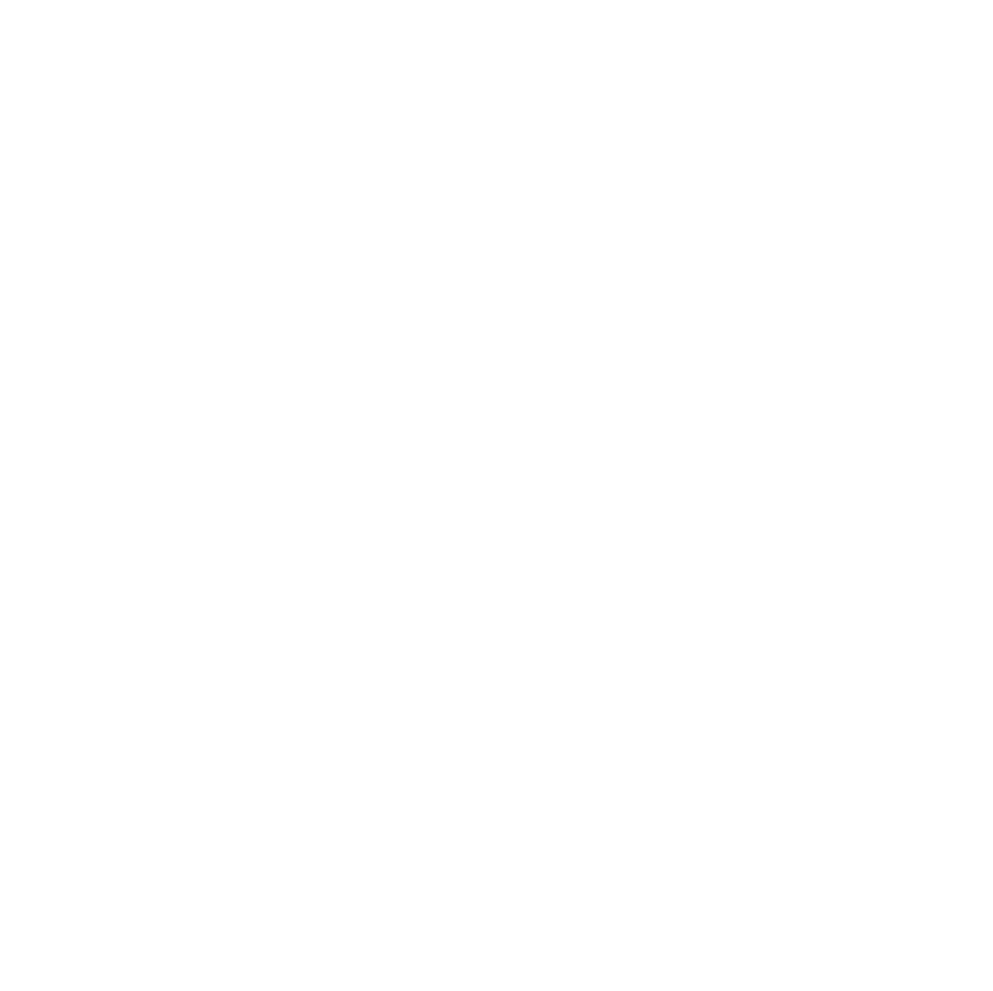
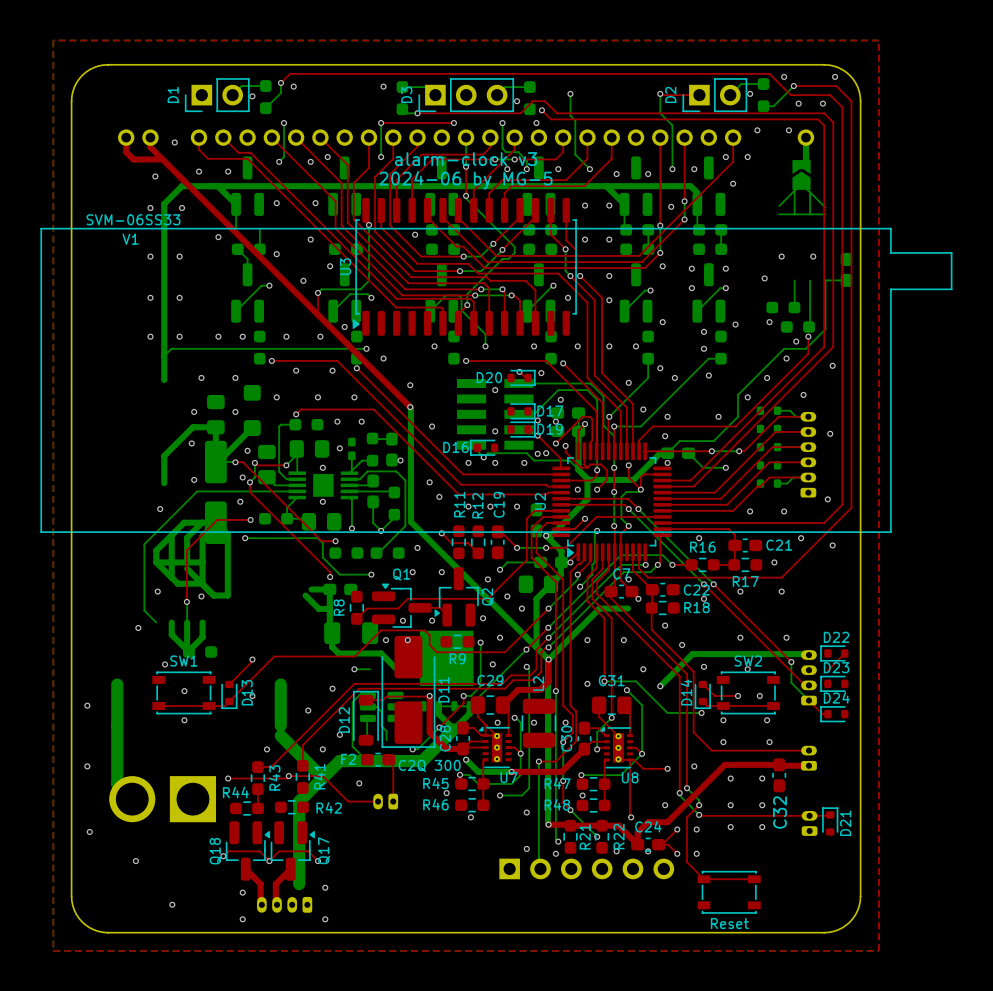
top zone outline: none -> (53, 40) (53, 950) (878, 950) (878, 40) (53, 40)
board edge: none -> (107, 64) (824, 64) (842, 69) (853, 79) (859, 91) (860, 101) (860, 896) (857, 910) (846, 925) (838, 929) (824, 932) (107, 932) (89, 927) (79, 918) (72, 905) (71, 896) (71, 101) (74, 87) (82, 75) (94, 67) (107, 64)
via: none -> (784, 76)
via: none -> (835, 76)
top track: none -> (280, 82) (290, 73) (769, 73) (790, 95) (830, 95) (842, 107) (842, 504) (824, 523) (662, 523)
bottom track: none -> (280, 82) (280, 93) (265, 108)
via: none -> (280, 82)
bottom track: none -> (763, 84) (741, 84) (730, 95)
bottom track: none -> (265, 86) (241, 86) (232, 95)
via: none -> (293, 86)
via: none -> (383, 86)
top track: none -> (793, 86) (836, 86) (851, 101) (851, 507) (781, 577) (648, 577) (639, 568) (639, 552)
bottom track: none -> (793, 86) (773, 106) (763, 106)
via: none -> (793, 86)
bottom track: none -> (402, 87) (427, 87)
bottom track: none -> (529, 87) (505, 87) (497, 95)
bottom track: none -> (570, 93) (570, 115) (575, 120) (575, 154) (589, 169)
via: none -> (570, 93)
top track: none -> (660, 93) (699, 95)
bottom track: none -> (660, 93) (660, 113) (672, 125) (672, 169)
via: none -> (660, 93)
via: none -> (750, 93)
D1: none -> (217, 95)
D3: none -> (466, 95)
D2: none -> (714, 95)
part: none -> (763, 95)
via: none -> (252, 96)
part: none -> (265, 97)
part: none -> (402, 98)
part: none -> (529, 98)
via: none -> (517, 101)
via: none -> (798, 103)
via: none -> (822, 103)
top track: none -> (541, 110) (551, 119) (818, 119) (824, 125) (824, 347) (730, 441)
via: none -> (541, 110)
bottom track: none -> (406, 113) (417, 113)
top track: none -> (417, 113) (520, 113) (532, 101) (544, 101) (557, 113) (824, 113) (833, 122) (833, 347) (693, 486) (662, 486)
via: none -> (417, 113)
bottom track: none -> (284, 123) (284, 157) (279, 161)
via: none -> (284, 123)
top track: none -> (381, 123) (453, 123)
bottom track: none -> (381, 123) (381, 157)
via: none -> (381, 123)
via: none -> (453, 123)
bottom track: none -> (502, 123) (502, 148) (506, 152) (518, 152) (526, 160) (526, 169)
via: none -> (502, 123)
via: none -> (536, 123)
via: none -> (757, 130)
via: none -> (788, 130)
top track: none -> (126, 137) (126, 152) (133, 159) (162, 159)
top track: none -> (150, 137) (150, 147) (410, 407)
top track: none -> (199, 137) (199, 149) (208, 158) (247, 158) (396, 307) (441, 307) (442, 323)
top track: none -> (223, 137) (238, 152) (250, 152) (396, 298) (470, 298) (473, 302) (473, 323)
top track: none -> (271, 137) (335, 201) (335, 228) (402, 295) (475, 295)
top track: none -> (296, 137) (341, 183) (341, 225) (405, 289) (481, 289)
top track: none -> (320, 137) (347, 164) (347, 222) (408, 283) (484, 283) (489, 288) (489, 323)
top track: none -> (368, 137) (368, 167) (353, 183) (353, 219) (411, 277) (486, 277) (490, 280) (525, 280) (535, 290) (535, 323)
top track: none -> (393, 137) (393, 158) (375, 177) (375, 231) (414, 271) (460, 271)
top track: none -> (417, 137) (417, 146) (390, 174) (390, 225) (421, 256) (463, 256)
bottom track: none -> (466, 137) (466, 166)
top track: none -> (490, 137) (490, 147) (483, 154) (421, 154) (396, 179) (396, 210)
top track: none -> (514, 137) (514, 149) (473, 190) (473, 210)
top track: none -> (563, 137) (563, 152) (555, 159) (514, 159)
top track: none -> (587, 137) (587, 158) (566, 180) (502, 180) (489, 193) (489, 210)
top track: none -> (611, 137) (611, 158) (584, 186) (511, 186) (504, 193) (504, 210)
top track: none -> (660, 137) (660, 225)
top track: none -> (684, 137) (684, 201)
top track: none -> (733, 137) (733, 161) (639, 255) (496, 255) (458, 217)
bottom track: none -> (805, 137) (805, 161) (801, 166)
via: none -> (174, 142)
via: none -> (327, 157)
via: none -> (381, 157)
via: none -> (725, 157)
via: none -> (747, 157)
text: none -> alarm-clock v3 (466, 159)
top track: none -> (495, 159) (432, 159) (412, 179) (412, 210)
bottom track: none -> (495, 159) (514, 159)
via: none -> (495, 159)
via: none -> (514, 159)
via: none -> (279, 161)
via: none -> (310, 161)
top track: none -> (466, 166) (466, 195)
via: none -> (466, 166)
via: none -> (507, 169)
via: none -> (526, 169)
via: none -> (558, 169)
via: none -> (589, 169)
via: none -> (672, 169)
via: none -> (694, 169)
via: none -> (199, 171)
via: none -> (228, 171)
via: none -> (616, 174)
via: none -> (648, 174)
part: none -> (801, 174)
via: none -> (155, 176)
text: none -> 2024-06 by MG-5 (465, 180)
via: none -> (733, 183)
bottom track: none -> (217, 186) (236, 204) (236, 228)
part: none -> (247, 186)
part: none -> (344, 186)
part: none -> (441, 186)
part: none -> (538, 186)
bottom track: none -> (606, 186) (624, 204) (624, 228)
part: none -> (636, 186)
part: none -> (708, 186)
bottom track: none -> (794, 190) (794, 214)
bottom track: none -> (810, 192) (810, 214)
bottom track: none -> (466, 195) (466, 198) (514, 246) (514, 252) (508, 258) (502, 258) (467, 294) (467, 305)
via: none -> (466, 195)
bottom track: none -> (684, 201) (684, 219)
via: none -> (684, 201)
via: none -> (276, 203)
via: none -> (315, 203)
via: none -> (585, 205)
via: none -> (609, 205)
via: none -> (671, 206)
bottom track: none -> (779, 206) (801, 183) (825, 207)
via: none -> (150, 208)
via: none -> (182, 208)
top track: none -> (381, 210) (381, 227) (417, 263) (468, 263) (478, 273) (558, 273) (587, 302) (587, 377) (620, 411) (620, 451)
top track: none -> (550, 210) (550, 234) (565, 249)
top track: none -> (566, 210) (566, 240) (575, 249)
bottom track: none -> (779, 214) (825, 214)
top track: none -> (535, 216) (502, 249)
top track: none -> (427, 217) (456, 246) (463, 246) (484, 268) (645, 268) (660, 252)
top track: none -> (442, 217) (487, 262) (642, 262) (684, 219)
top track: none -> (520, 217) (493, 243)
via: none -> (684, 219)
bottom track: none -> (368, 225) (368, 280) (360, 289) (321, 289) (317, 292)
via: none -> (368, 225)
bottom track: none -> (660, 225) (660, 252)
via: none -> (660, 225)
bottom track: none -> (697, 228) (697, 192) (690, 186) (182, 186) (164, 203) (164, 380)
bottom track: none -> (259, 229) (259, 249)
part: none -> (443, 229)
part: none -> (540, 229)
part: none -> (637, 229)
bottom track: none -> (648, 229) (648, 249)
part: none -> (710, 229)
bottom track: none -> (721, 229) (721, 249)
via: none -> (415, 234)
via: none -> (218, 237)
via: none -> (310, 239)
via: none -> (585, 239)
via: none -> (609, 239)
bottom track: none -> (493, 243) (480, 256) (463, 256)
via: none -> (493, 243)
bottom track: none -> (237, 249) (247, 259) (247, 274)
part: none -> (248, 249)
part: none -> (345, 249)
part: none -> (443, 249)
bottom track: none -> (502, 249) (481, 271) (460, 271)
via: none -> (502, 249)
part: none -> (540, 249)
bottom track: none -> (565, 249) (565, 271) (570, 275)
via: none -> (565, 249)
part: none -> (637, 249)
part: none -> (710, 249)
via: none -> (660, 252)
via: none -> (276, 254)
via: none -> (150, 256)
via: none -> (179, 256)
via: none -> (463, 256)
via: none -> (781, 256)
via: none -> (813, 256)
via: none -> (330, 266)
U3: none -> (464, 266)
via: none -> (662, 266)
via: none -> (691, 268)
via: none -> (725, 268)
part: none -> (846, 269)
via: none -> (460, 271)
top track: none -> (570, 275) (594, 300) (594, 375) (626, 407) (626, 451)
via: none -> (570, 275)
top track: none -> (580, 275) (602, 297) (602, 373) (632, 404) (632, 451)
via: none -> (580, 275)
via: none -> (609, 275)
via: none -> (764, 278)
via: none -> (303, 280)
bottom track: none -> (794, 280) (794, 307)
bottom track: none -> (810, 280) (810, 325)
bottom track: none -> (825, 280) (846, 280)
bottom track: none -> (825, 280) (825, 329) (805, 348) (784, 348) (737, 394) (737, 416) (713, 441) (679, 441) (667, 453) (660, 453) (633, 479) (587, 479)
bottom track: none -> (269, 285) (261, 285) (236, 311)
via: none -> (269, 285)
bottom track: none -> (553, 285) (527, 311)
via: none -> (553, 285)
via: none -> (691, 288)
bottom track: none -> (725, 288) (720, 288) (697, 311)
via: none -> (725, 288)
bottom track: none -> (481, 289) (502, 289)
via: none -> (481, 289)
top track: none -> (502, 289) (504, 291) (504, 323)
via: none -> (502, 289)
bottom track: none -> (650, 290) (645, 290) (624, 311)
via: none -> (650, 290)
part: none -> (247, 292)
top track: none -> (317, 292) (319, 316)
via: none -> (317, 292)
part: none -> (344, 292)
part: none -> (441, 292)
part: none -> (538, 292)
part: none -> (636, 292)
part: none -> (708, 292)
bottom track: none -> (475, 295) (511, 295)
via: none -> (475, 295)
top track: none -> (511, 295) (514, 295) (520, 300) (520, 323)
via: none -> (511, 295)
via: none -> (150, 297)
via: none -> (179, 297)
bottom track: none -> (371, 297) (367, 294) (350, 294) (333, 311)
via: none -> (371, 297)
via: none -> (568, 297)
via: none -> (609, 300)
top track: none -> (467, 305) (458, 314)
via: none -> (467, 305)
part: none -> (783, 307)
bottom track: none -> (430, 311) (446, 295) (458, 295) (461, 298) (461, 310) (485, 334) (485, 346)
via: none -> (662, 322)
via: none -> (769, 322)
via: none -> (735, 324)
via: none -> (344, 326)
part: none -> (797, 326)
V1: none -> SVM-06SS33 (496, 331)
via: none -> (703, 331)
via: none -> (150, 336)
via: none -> (179, 336)
via: none -> (218, 336)
via: none -> (242, 336)
via: none -> (286, 336)
via: none -> (320, 336)
top track: none -> (808, 336) (808, 353) (735, 426) (653, 426) (639, 440) (639, 451)
via: none -> (808, 336)
via: none -> (796, 341)
via: none -> (434, 346)
via: none -> (485, 346)
via: none -> (534, 346)
via: none -> (577, 346)
via: none -> (609, 346)
via: none -> (636, 346)
part: none -> (259, 347)
part: none -> (356, 347)
part: none -> (453, 347)
part: none -> (551, 347)
part: none -> (648, 347)
part: none -> (720, 347)
bottom track: none -> (366, 348) (171, 348) (164, 356)
via: none -> (366, 348)
via: none -> (703, 348)
via: none -> (383, 358)
bottom track: none -> (648, 358) (648, 377) (609, 416)
bottom track: none -> (720, 358) (708, 358) (640, 426) (614, 426)
via: none -> (786, 358)
top track: none -> (271, 360) (337, 360) (461, 484) (546, 484) (548, 486) (561, 486)
via: none -> (271, 360)
top track: none -> (466, 360) (546, 360) (596, 411) (596, 451)
via: none -> (466, 360)
top track: none -> (563, 363) (602, 402) (602, 451)
via: none -> (563, 363)
via: none -> (832, 365)
top track: none -> (356, 368) (463, 474) (561, 474)
via: none -> (356, 368)
via: none -> (660, 368)
via: none -> (296, 370)
via: none -> (332, 370)
top track: none -> (519, 371) (525, 377)
via: none -> (519, 371)
via: none -> (541, 373)
via: none -> (708, 375)
via: none -> (201, 377)
via: none -> (235, 377)
D20: none -> (521, 377)
via: none -> (674, 377)
via: none -> (767, 377)
via: none -> (628, 382)
bottom track: none -> (518, 383) (590, 383) (603, 396) (603, 425) (614, 436) (614, 467)
via: none -> (410, 385)
via: none -> (495, 390)
via: none -> (803, 394)
via: none -> (276, 397)
via: none -> (317, 397)
via: none -> (354, 397)
via: none -> (747, 397)
via: none -> (560, 399)
bottom track: none -> (410, 407) (410, 521) (548, 659)
via: none -> (410, 407)
via: none -> (643, 409)
part: none -> (252, 410)
part: none -> (768, 410)
bottom track: none -> (777, 410) (790, 410) (796, 416) (808, 416)
via: none -> (194, 411)
via: none -> (235, 411)
D17: none -> (521, 411)
part: none -> (568, 413)
bottom track: none -> (578, 413) (578, 469) (587, 478) (587, 499) (551, 535) (546, 535) (561, 551) (561, 562) (570, 562)
part: none -> (215, 414)
top track: none -> (296, 414) (300, 409) (373, 409) (458, 494) (546, 494) (548, 492) (561, 492)
via: none -> (296, 414)
part: none -> (495, 414)
bottom track: none -> (518, 414) (534, 414) (558, 390) (587, 390) (597, 399) (597, 470)
top track: none -> (609, 416) (608, 450)
via: none -> (609, 416)
via: none -> (667, 416)
via: none -> (718, 416)
top track: none -> (808, 416) (778, 416) (744, 451) (739, 451)
via: none -> (537, 420)
via: none -> (337, 421)
via: none -> (361, 421)
via: none -> (555, 421)
bottom track: none -> (295, 424) (280, 424) (279, 426) (279, 471) (286, 479) (297, 479)
part: none -> (306, 424)
top track: none -> (585, 424) (578, 430) (578, 451)
via: none -> (585, 424)
via: none -> (432, 426)
top track: none -> (614, 426) (614, 450)
via: none -> (614, 426)
bottom track: none -> (252, 428) (220, 460)
part: none -> (768, 428)
D19: none -> (521, 429)
top track: none -> (527, 429) (531, 429) (560, 458) (560, 467)
via: none -> (495, 431)
part: none -> (568, 431)
top track: none -> (808, 431) (775, 431) (714, 492) (662, 492)
via: none -> (830, 433)
via: none -> (537, 435)
via: none -> (665, 436)
bottom track: none -> (373, 439) (391, 439)
top track: none -> (730, 441) (690, 480) (662, 480)
via: none -> (191, 443)
top track: none -> (555, 443) (582, 416) (589, 416) (592, 419) (590, 451)
via: none -> (555, 443)
bottom track: none -> (471, 445) (483, 457) (487, 453) (526, 453) (534, 460) (569, 460) (578, 469)
top track: none -> (565, 445) (565, 452) (581, 467) (587, 467)
via: none -> (565, 445)
D16: none -> (484, 447)
part: none -> (768, 447)
top track: none -> (808, 447) (772, 447) (720, 498) (662, 498)
part: none -> (309, 448)
via: none -> (339, 448)
part: none -> (351, 448)
bottom track: none -> (297, 449) (297, 473)
part: none -> (372, 449)
part: none -> (391, 449)
via: none -> (247, 450)
top track: none -> (584, 451) (584, 464) (587, 467)
top track: none -> (645, 451) (711, 451)
bottom track: none -> (711, 451) (739, 451)
via: none -> (711, 451)
via: none -> (739, 451)
via: none -> (537, 453)
via: none -> (546, 453)
part: none -> (678, 453)
bottom track: none -> (688, 453) (703, 467) (725, 467)
bottom track: none -> (296, 454) (286, 465)
part: none -> (808, 454)
bottom track: none -> (351, 455) (351, 470)
via: none -> (483, 457)
bottom track: none -> (372, 460) (362, 460) (349, 473)
via: none -> (400, 460)
top track: none -> (235, 462) (242, 462) (321, 541) (335, 541)
bottom track: none -> (235, 462) (215, 462) (215, 427) (192, 427) (164, 455) (164, 483)
via: none -> (235, 462)
top track: none -> (254, 462) (257, 465) (286, 465)
bottom track: none -> (254, 462) (254, 477) (250, 482)
via: none -> (254, 462)
via: none -> (468, 462)
via: none -> (495, 462)
via: none -> (524, 462)
via: none -> (667, 462)
top track: none -> (808, 462) (769, 462) (727, 504) (662, 504)
part: none -> (266, 464)
via: none -> (286, 465)
top track: none -> (628, 465) (628, 477) (640, 489) (640, 477) (643, 474) (662, 474)
via: none -> (628, 465)
part: none -> (768, 465)
via: none -> (322, 467)
top track: none -> (587, 467) (590, 464) (601, 464) (606, 470) (606, 479) (597, 489)
top track: none -> (614, 467) (614, 492)
via: none -> (614, 467)
via: none -> (725, 467)
top track: none -> (597, 470) (597, 475) (591, 480) (561, 480)
via: none -> (597, 470)
via: none -> (242, 477)
bottom track: none -> (266, 477) (275, 485) (297, 485)
top track: none -> (808, 477) (769, 477) (733, 510) (662, 510)
bottom track: none -> (808, 477) (793, 477) (787, 483) (777, 483)
via: none -> (194, 479)
bottom track: none -> (349, 479) (359, 479) (367, 471) (396, 471) (405, 480) (405, 526) (378, 553)
top track: none -> (250, 482) (250, 492) (330, 572) (330, 577)
via: none -> (250, 482)
via: none -> (429, 482)
part: none -> (768, 483)
part: none -> (323, 485)
bottom track: none -> (349, 485) (368, 485)
via: none -> (577, 489)
via: none -> (597, 489)
bottom track: none -> (640, 489) (638, 492) (626, 492) (621, 496) (621, 518) (628, 526)
via: none -> (640, 489)
bottom track: none -> (297, 491) (197, 491) (144, 544) (144, 610) (156, 622)
bottom track: none -> (349, 491) (393, 491)
part: none -> (373, 491)
part: none -> (215, 492)
bottom track: none -> (614, 492) (614, 526)
via: none -> (614, 492)
via: none -> (439, 496)
bottom track: none -> (297, 497) (287, 507) (287, 518) (305, 518)
bottom track: none -> (349, 497) (351, 500) (351, 528)
top track: none -> (561, 498) (628, 498) (638, 509)
via: none -> (827, 499)
via: none -> (240, 501)
via: none -> (322, 501)
bottom track: none -> (373, 501) (373, 522) (381, 530) (394, 517)
U2: none -> (611, 501)
part: none -> (394, 503)
top track: none -> (561, 504) (624, 504) (628, 509)
via: none -> (468, 506)
via: none -> (490, 506)
via: none -> (517, 506)
via: none -> (160, 509)
bottom track: none -> (628, 509) (703, 584)
via: none -> (628, 509)
bottom track: none -> (638, 509) (713, 584)
via: none -> (638, 509)
top track: none -> (561, 510) (534, 510) (526, 518) (526, 560) (487, 598) (407, 598) (398, 608) (367, 608) (356, 618)
via: none -> (750, 511)
via: none -> (784, 511)
top track: none -> (561, 516) (543, 516) (531, 528) (531, 557) (555, 581) (555, 691)
top track: none -> (662, 516) (596, 516) (565, 547) (546, 547)
part: none -> (276, 518)
top track: none -> (585, 518) (574, 529) (561, 529)
via: none -> (585, 518)
top track: none -> (250, 519) (217, 519) (186, 550) (186, 601)
via: none -> (250, 519)
part: none -> (536, 520)
part: none -> (321, 521)
bottom track: none -> (202, 522) (187, 537) (187, 562)
bottom track: none -> (215, 522) (202, 535) (202, 584)
bottom track: none -> (215, 522) (227, 534) (227, 595) (213, 595) (187, 568)
bottom track: none -> (215, 522) (184, 522) (156, 550) (156, 562)
top track: none -> (561, 523) (546, 523) (536, 533) (536, 552) (563, 579) (563, 705) (572, 715) (572, 732) (563, 742)
top track: none -> (614, 526) (614, 587)
via: none -> (614, 526)
top track: none -> (628, 526) (620, 533) (620, 580) (638, 598)
via: none -> (628, 526)
via: none -> (351, 528)
top track: none -> (662, 529) (728, 529) (734, 534) (734, 564)
via: none -> (381, 530)
bottom track: none -> (597, 530) (594, 533) (594, 562) (592, 564) (592, 574) (580, 586)
via: none -> (597, 530)
top track: none -> (500, 531) (517, 547)
top track: none -> (441, 533) (451, 543) (467, 543) (478, 553)
via: none -> (441, 533)
bottom track: none -> (171, 535) (171, 577) (177, 583) (202, 583)
via: none -> (546, 535)
top track: none -> (662, 535) (660, 537) (660, 562) (657, 564)
bottom track: none -> (245, 538) (317, 538) (322, 543) (322, 557) (339, 574) (371, 574)
via: none -> (245, 538)
via: none -> (699, 538)
via: none -> (801, 538)
via: none -> (335, 541)
R11: none -> (458, 542)
R12: none -> (478, 542)
C19: none -> (497, 542)
C21: none -> (745, 545)
via: none -> (832, 545)
via: none -> (417, 547)
bottom track: none -> (517, 547) (546, 547)
via: none -> (517, 547)
via: none -> (546, 547)
top track: none -> (578, 552) (570, 562)
top track: none -> (590, 552) (590, 561) (577, 574)
top track: none -> (596, 552) (596, 567) (587, 577) (587, 601) (604, 618) (604, 681)
top track: none -> (602, 552) (602, 569) (592, 579) (592, 598) (611, 618) (611, 717)
top track: none -> (608, 552) (608, 570) (597, 581) (597, 594) (679, 676) (679, 793)
top track: none -> (632, 552) (632, 570) (652, 589) (652, 607)
part: none -> (346, 553)
part: none -> (387, 553)
top track: none -> (584, 559) (570, 572) (570, 705) (576, 711) (576, 741) (555, 761) (538, 761)
bottom track: none -> (156, 562) (202, 562)
bottom track: none -> (156, 562) (171, 577)
bottom track: none -> (540, 562) (507, 562) (500, 569)
part: none -> (551, 562)
via: none -> (570, 562)
via: none -> (774, 562)
bottom track: none -> (560, 563) (560, 574) (536, 598) (536, 647)
bottom track: none -> (645, 564) (621, 564) (548, 637)
via: none -> (645, 564)
bottom track: none -> (657, 564) (650, 572) (623, 572) (548, 647)
via: none -> (657, 564)
top track: none -> (672, 564) (691, 564)
bottom track: none -> (672, 564) (662, 555) (620, 555) (548, 627)
via: none -> (672, 564)
R16: none -> (702, 564)
top track: none -> (713, 564) (734, 564)
R17: none -> (745, 564)
via: none -> (500, 569)
via: none -> (412, 572)
via: none -> (441, 572)
via: none -> (371, 574)
bottom track: none -> (577, 574) (577, 579) (548, 608)
via: none -> (577, 574)
via: none -> (330, 577)
via: none -> (487, 579)
via: none -> (628, 579)
part: none -> (538, 584)
top track: none -> (703, 584) (805, 685)
via: none -> (703, 584)
top track: none -> (713, 584) (791, 661)
via: none -> (713, 584)
via: none -> (580, 586)
bottom track: none -> (311, 589) (329, 589) (329, 630)
part: none -> (340, 589)
C22: none -> (662, 589)
via: none -> (157, 591)
top track: none -> (610, 591) (610, 598) (687, 674) (687, 788)
C7: none -> (621, 591)
via: none -> (740, 591)
via: none -> (781, 591)
bottom track: none -> (305, 595) (318, 608) (329, 608)
via: none -> (201, 596)
Q2: none -> (456, 596)
via: none -> (507, 596)
via: none -> (638, 598)
via: none -> (703, 598)
bottom track: none -> (186, 601) (187, 650)
via: none -> (186, 601)
Q1: none -> (401, 605)
R8: none -> (356, 607)
top track: none -> (419, 607) (439, 607) (447, 615)
top track: none -> (651, 607) (651, 629) (693, 671) (693, 732) (711, 750) (808, 750)
R18: none -> (662, 607)
via: none -> (521, 608)
top track: none -> (548, 608) (504, 652) (436, 652) (429, 645) (429, 635) (424, 630) (381, 630) (355, 656) (274, 656) (224, 706) (158, 706)
via: none -> (548, 608)
bottom track: none -> (627, 608) (599, 608) (548, 660) (548, 824)
via: none -> (483, 618)
via: none -> (402, 620)
via: none -> (432, 620)
bottom track: none -> (171, 622) (171, 634) (188, 651)
bottom track: none -> (202, 622) (202, 637) (188, 650)
via: none -> (665, 625)
top track: none -> (548, 627) (526, 649)
via: none -> (548, 627)
via: none -> (138, 628)
bottom track: none -> (332, 633) (332, 647) (338, 653) (381, 653) (396, 669)
part: none -> (351, 633)
via: none -> (500, 637)
top track: none -> (548, 637) (536, 649) (536, 669) (530, 675) (510, 675) (502, 683) (354, 683) (271, 767) (257, 767)
via: none -> (548, 637)
via: none -> (740, 637)
via: none -> (786, 637)
via: none -> (385, 640)
via: none -> (407, 640)
via: none -> (587, 640)
via: none -> (623, 640)
R9: none -> (457, 641)
bottom track: none -> (480, 642) (480, 686) (470, 695) (463, 695)
via: none -> (480, 642)
via: none -> (682, 645)
top track: none -> (548, 647) (541, 652) (541, 671) (532, 680) (513, 680) (504, 688) (359, 688) (302, 745) (302, 765)
via: none -> (548, 647)
bottom track: none -> (526, 649) (469, 706)
via: none -> (526, 649)
part: none -> (200, 651)
D22: none -> (834, 653)
top track: none -> (844, 653) (828, 670)
bottom track: none -> (808, 654) (692, 654) (660, 686)
top track: none -> (252, 659) (229, 684)
via: none -> (252, 659)
top track: none -> (548, 659) (548, 681) (540, 689) (518, 689) (502, 705)
via: none -> (548, 659)
bottom track: none -> (791, 661) (791, 682) (808, 700)
via: none -> (791, 661)
via: none -> (165, 664)
via: none -> (492, 664)
bottom track: none -> (526, 666) (529, 669) (529, 788) (521, 795) (500, 795)
via: none -> (526, 666)
via: none -> (703, 666)
bottom track: none -> (354, 669) (370, 669)
via: none -> (354, 669)
via: none -> (643, 669)
via: none -> (747, 669)
part: none -> (446, 671)
part: none -> (808, 677)
bottom track: none -> (604, 681) (636, 681) (667, 712) (701, 712)
via: none -> (604, 681)
via: none -> (587, 683)
D23: none -> (834, 683)
bottom track: none -> (117, 684) (117, 784) (132, 799)
bottom track: none -> (280, 684) (280, 725)
top track: none -> (703, 684) (714, 695) (737, 695)
via: none -> (660, 686)
via: none -> (332, 688)
bottom track: none -> (626, 690) (642, 705) (642, 753) (620, 775) (581, 775)
via: none -> (626, 690)
via: none -> (184, 691)
D11: none -> (408, 691)
bottom track: none -> (555, 691) (555, 839) (558, 841)
via: none -> (555, 691)
SW1: none -> (183, 692)
SW2: none -> (748, 692)
D13: none -> (229, 694)
D14: none -> (702, 694)
via: none -> (252, 695)
bottom track: none -> (367, 695) (359, 695) (352, 702) (352, 746) (367, 761)
via: none -> (429, 695)
top track: none -> (463, 695) (463, 703) (439, 727)
via: none -> (463, 695)
via: none -> (737, 695)
via: none -> (759, 695)
top track: none -> (365, 700) (382, 700) (386, 696) (429, 695) (429, 732) (446, 748) (463, 748) (470, 741) (485, 741)
top track: none -> (808, 700) (822, 714) (827, 714)
top track: none -> (702, 701) (707, 706) (773, 706)
via: none -> (87, 705)
top track: none -> (477, 705) (477, 716) (497, 736)
C29: none -> (490, 705)
top track: none -> (599, 705) (599, 717) (618, 736)
C31: none -> (611, 705)
bottom track: none -> (367, 706) (376, 706) (381, 711) (381, 726) (386, 731) (386, 740)
part: none -> (381, 706)
bottom track: none -> (469, 706) (438, 706) (438, 714) (453, 729)
bottom track: none -> (469, 706) (469, 713) (453, 729)
via: none -> (308, 710)
top track: none -> (508, 710) (508, 735)
top track: none -> (629, 710) (629, 735)
via: none -> (701, 712)
D24: none -> (834, 714)
bottom track: none -> (514, 717) (520, 722) (520, 774) (511, 783) (478, 783) (469, 774) (460, 774)
via: none -> (514, 717)
bottom track: none -> (611, 717) (597, 732) (597, 749)
via: none -> (611, 717)
D12: none -> (365, 718)
bottom track: none -> (367, 719) (367, 740)
via: none -> (184, 720)
via: none -> (723, 720)
via: none -> (767, 720)
via: none -> (497, 722)
via: none -> (534, 722)
via: none -> (565, 722)
L2: none -> (538, 723)
top track: none -> (485, 724) (485, 735)
bottom track: none -> (439, 727) (417, 749) (412, 749)
via: none -> (439, 727)
top track: none -> (463, 728) (473, 728) (481, 735) (496, 735)
top track: none -> (584, 728) (598, 728) (605, 735)
bottom track: none -> (453, 729) (422, 761) (339, 761) (299, 801) (299, 887)
via: none -> (339, 734)
bottom track: none -> (280, 735) (322, 777)
C28: none -> (463, 738)
C30: none -> (584, 738)
top track: none -> (606, 741) (591, 741) (561, 771) (511, 771)
bottom track: none -> (563, 742) (563, 780)
via: none -> (563, 742)
via: none -> (723, 742)
via: none -> (769, 742)
top track: none -> (464, 747) (485, 747)
U7: none -> (495, 747)
top track: none -> (508, 747) (514, 747) (520, 753)
top track: none -> (606, 747) (597, 749)
U8: none -> (616, 747)
top track: none -> (629, 747) (636, 747) (642, 753)
via: none -> (267, 749)
via: none -> (322, 749)
via: none -> (412, 749)
via: none -> (597, 749)
via: none -> (520, 753)
via: none -> (642, 753)
part: none -> (808, 758)
F2: none -> C2Q 300 (378, 759)
top track: none -> (388, 759) (393, 764) (393, 801)
bottom track: none -> (466, 759) (478, 771) (511, 771)
via: none -> (466, 759)
top track: none -> (485, 759) (483, 761) (483, 805)
top track: none -> (606, 759) (604, 762) (604, 805)
top track: none -> (619, 759) (634, 759) (643, 768) (667, 768)
top track: none -> (629, 759) (631, 817)
bottom track: none -> (538, 761) (538, 867)
via: none -> (538, 761)
top track: none -> (779, 764) (724, 764) (667, 822) (648, 822) (637, 832) (637, 844) (618, 825) (570, 825)
top track: none -> (780, 765) (808, 765)
via: none -> (87, 766)
via: none -> (694, 766)
via: none -> (667, 768)
via: none -> (511, 771)
via: none -> (460, 774)
via: none -> (581, 775)
C32: none -> (779, 775)
via: none -> (288, 776)
R41: none -> (302, 776)
top track: none -> (228, 778) (322, 776) (348, 801) (378, 801)
via: none -> (228, 778)
R43: none -> (257, 778)
via: none -> (730, 778)
via: none -> (762, 778)
top track: none -> (563, 780) (563, 802) (570, 810)
via: none -> (563, 780)
via: none -> (359, 783)
R45: none -> (472, 783)
R47: none -> (593, 784)
bottom track: none -> (687, 788) (699, 800) (699, 805)
via: none -> (687, 788)
top track: none -> (257, 789) (257, 808)
via: none -> (446, 793)
bottom track: none -> (679, 793) (679, 795) (699, 814)
via: none -> (679, 793)
via: none -> (500, 795)
via: none -> (582, 795)
part: none -> (162, 799)
part: none -> (385, 801)
R46: none -> (472, 805)
R48: none -> (593, 805)
via: none -> (665, 805)
top track: none -> (699, 805) (687, 817) (687, 862) (703, 879) (754, 879)
via: none -> (699, 805)
via: none -> (730, 805)
via: none -> (762, 805)
R42: none -> (291, 807)
R44: none -> (246, 808)
bottom track: none -> (570, 810) (597, 836)
via: none -> (570, 810)
via: none -> (526, 812)
top track: none -> (699, 814) (829, 815)
via: none -> (699, 814)
via: none -> (470, 817)
via: none -> (631, 817)
D21: none -> (830, 821)
part: none -> (809, 823)
top track: none -> (548, 824) (569, 824)
via: none -> (548, 824)
via: none -> (730, 827)
via: none -> (762, 827)
top track: none -> (677, 829) (662, 844)
via: none -> (677, 829)
via: none -> (696, 829)
via: none -> (89, 831)
R21: none -> (570, 836)
via: none -> (597, 836)
R22: none -> (602, 836)
via: none -> (558, 841)
C24: none -> (648, 844)
top track: none -> (658, 844) (668, 844) (677, 853)
via: none -> (526, 848)
Q18: none -> (247, 850)
Q17: none -> (292, 850)
via: none -> (616, 851)
via: none -> (648, 851)
via: none -> (555, 853)
via: none -> (677, 853)
via: none -> (696, 853)
top track: none -> (223, 856) (228, 851) (259, 851) (269, 861) (279, 851) (308, 851) (317, 861)
via: none -> (223, 856)
via: none -> (135, 861)
via: none -> (269, 861)
via: none -> (317, 861)
part: none -> (586, 868)
top track: none -> (245, 869) (260, 884) (260, 906)
top track: none -> (290, 869) (275, 884) (275, 906)
via: none -> (325, 887)
via: none -> (242, 892)
part: none -> Reset (729, 892)
via: none -> (172, 904)
part: none -> (284, 904)
via: none -> (242, 919)
via: none -> (325, 919)

